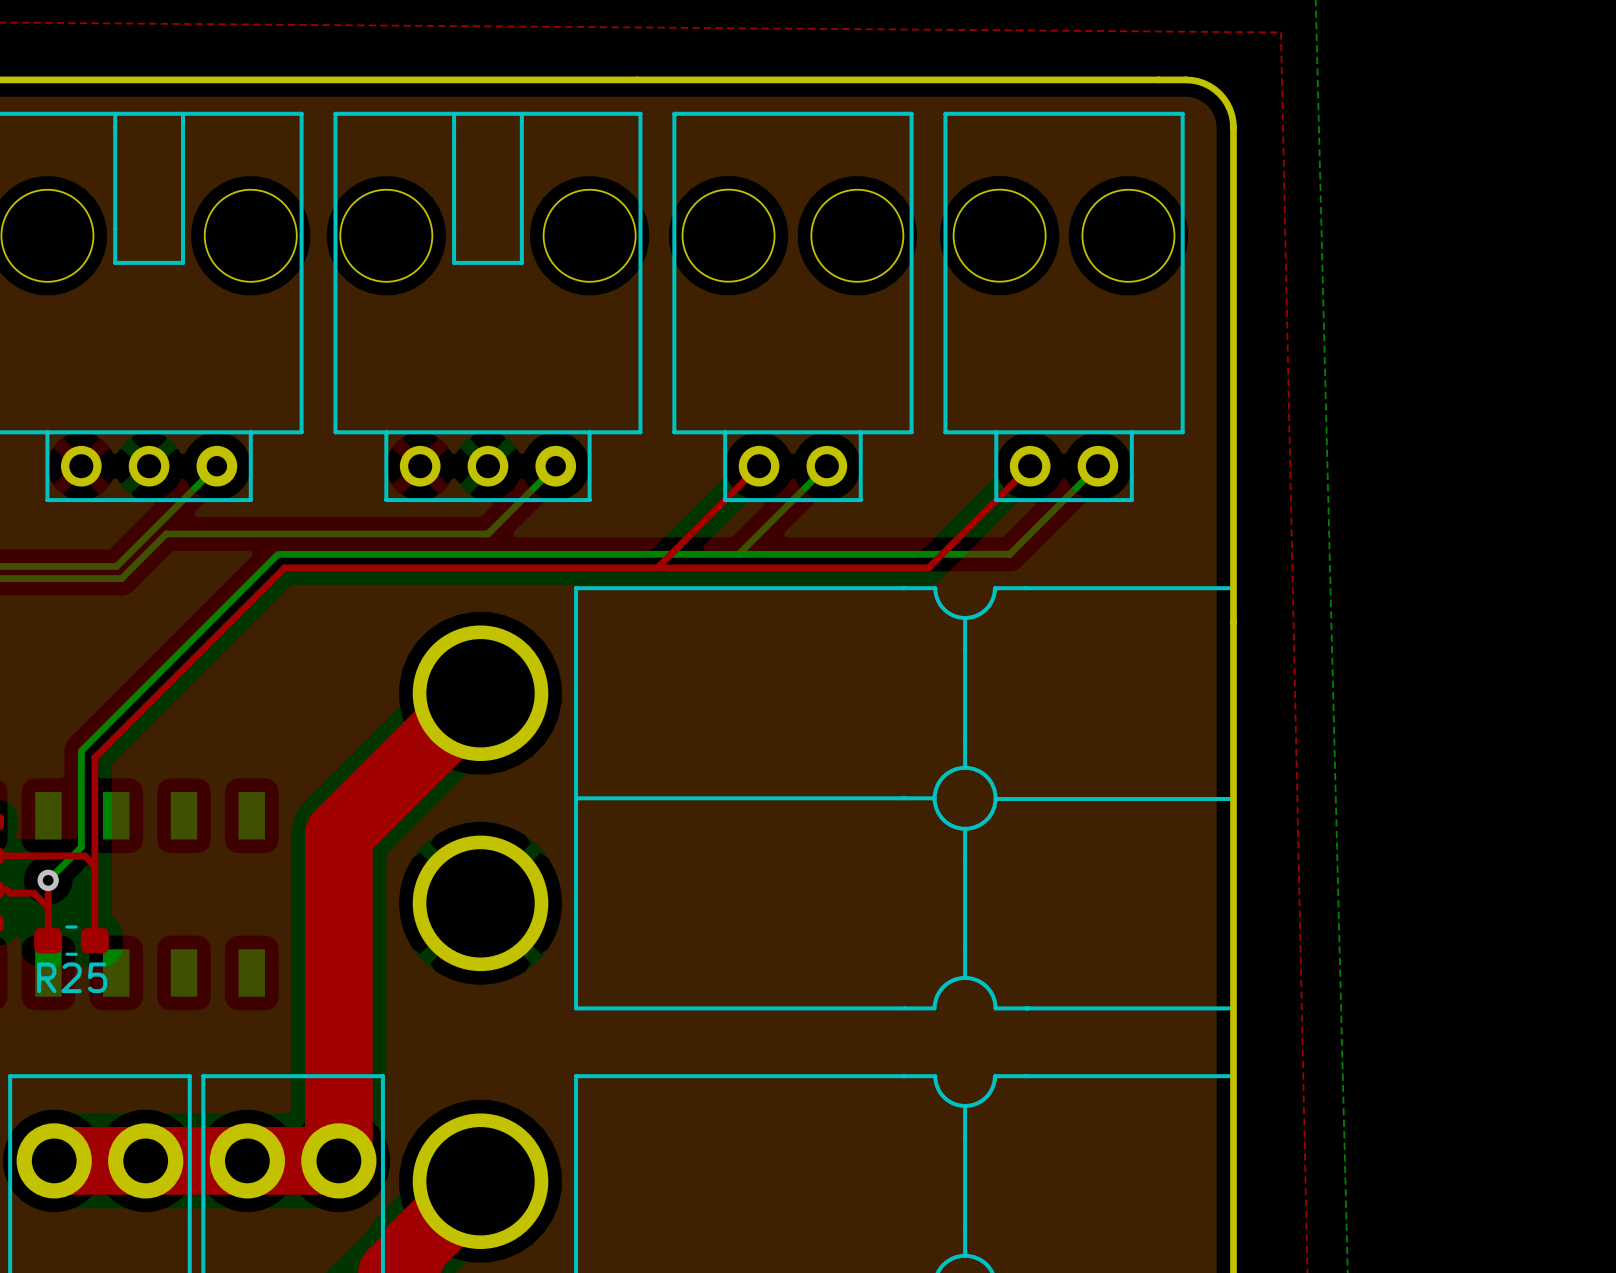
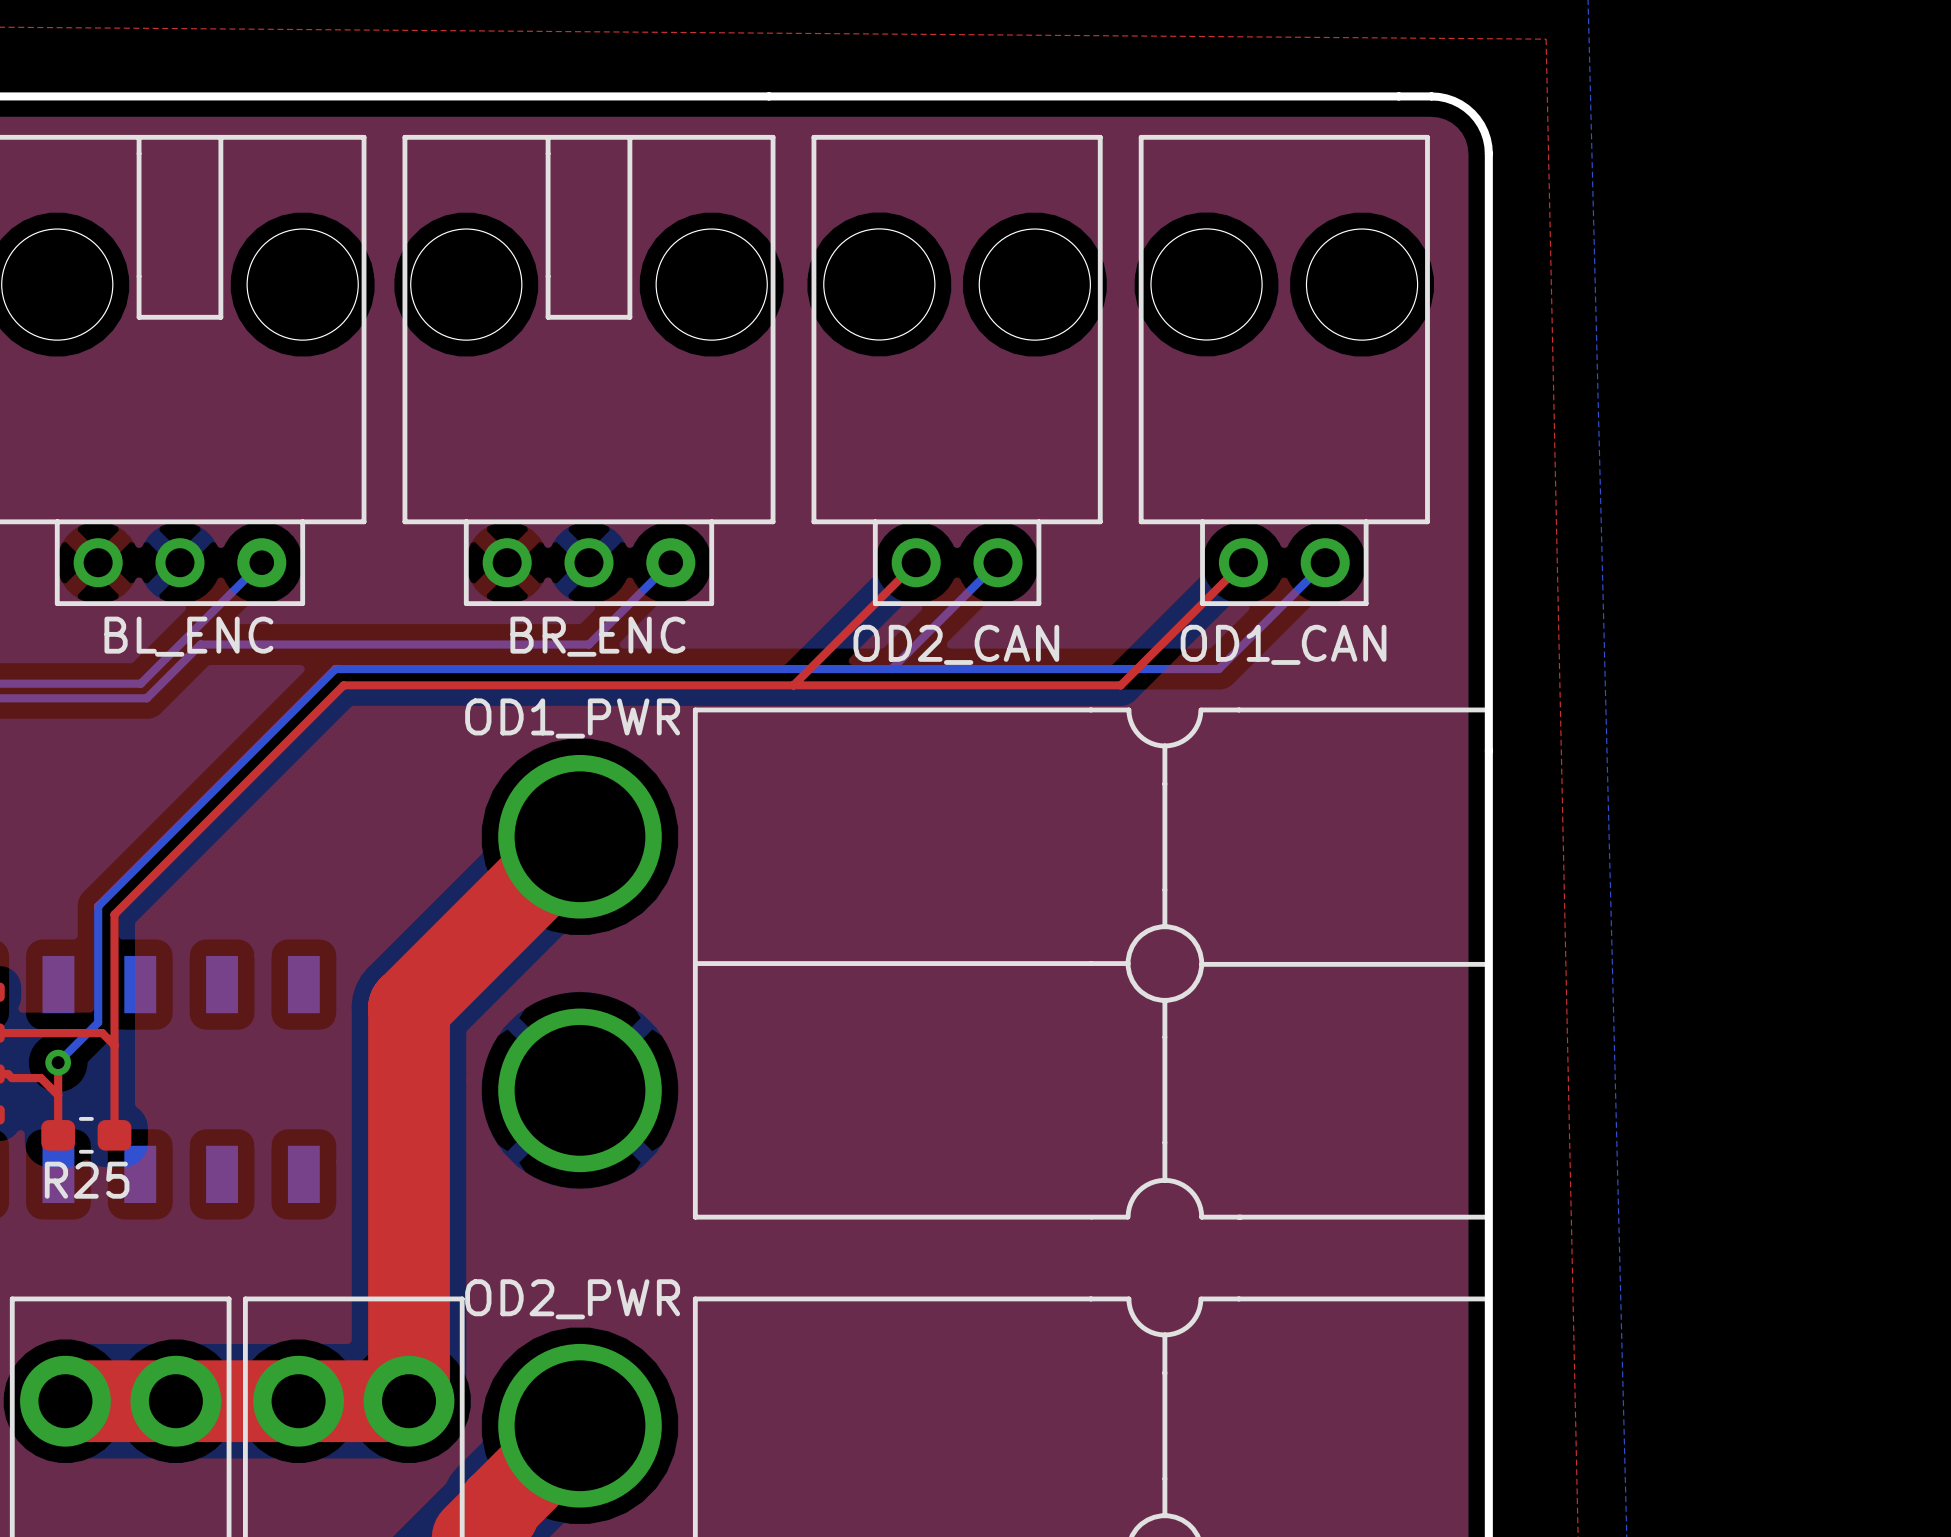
text: none -> BL_ENC (188, 636)
text: none -> BR_ENC (597, 636)
text: none -> OD2_CAN (956, 644)
text: none -> OD1_CAN (1283, 644)
text: none -> OD1_PWR (572, 718)
text: none -> OD2_PWR (572, 1299)

